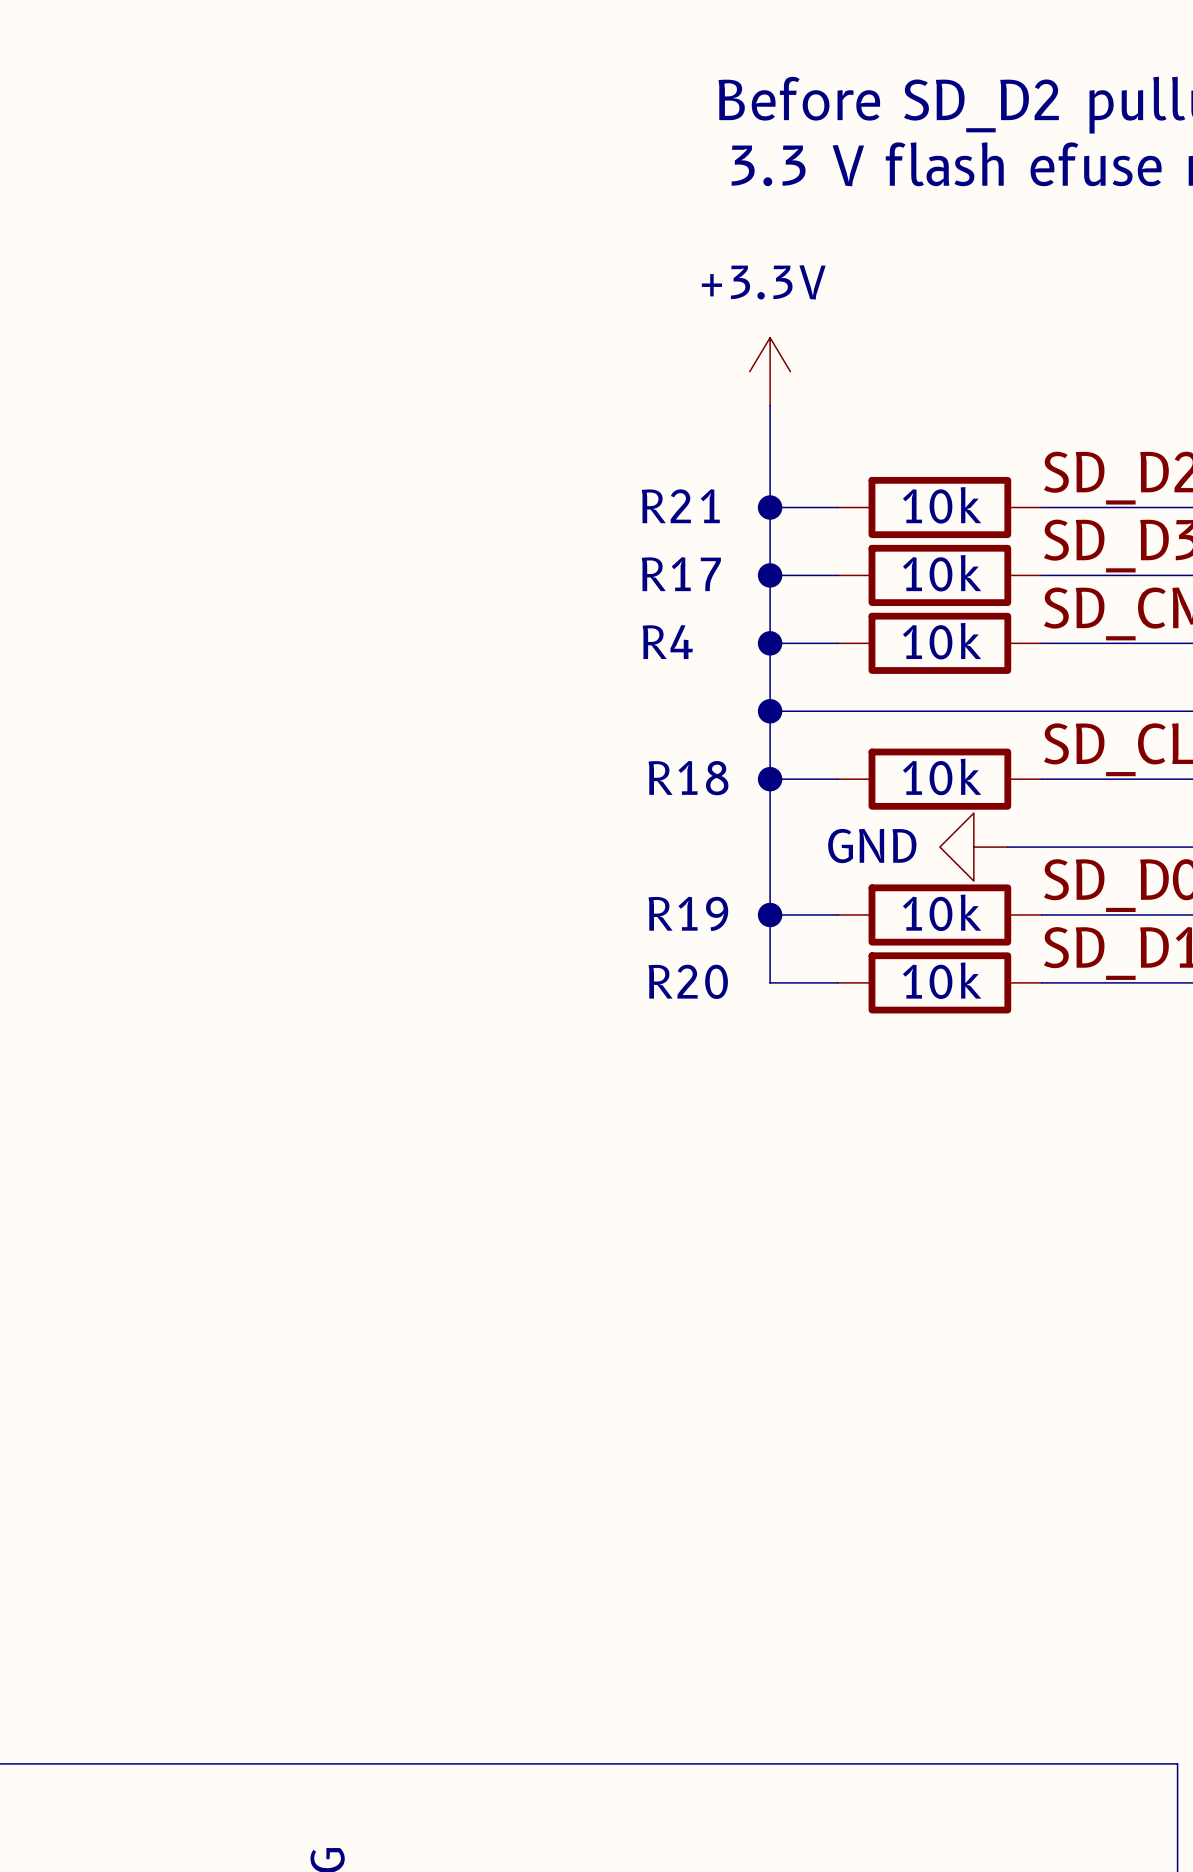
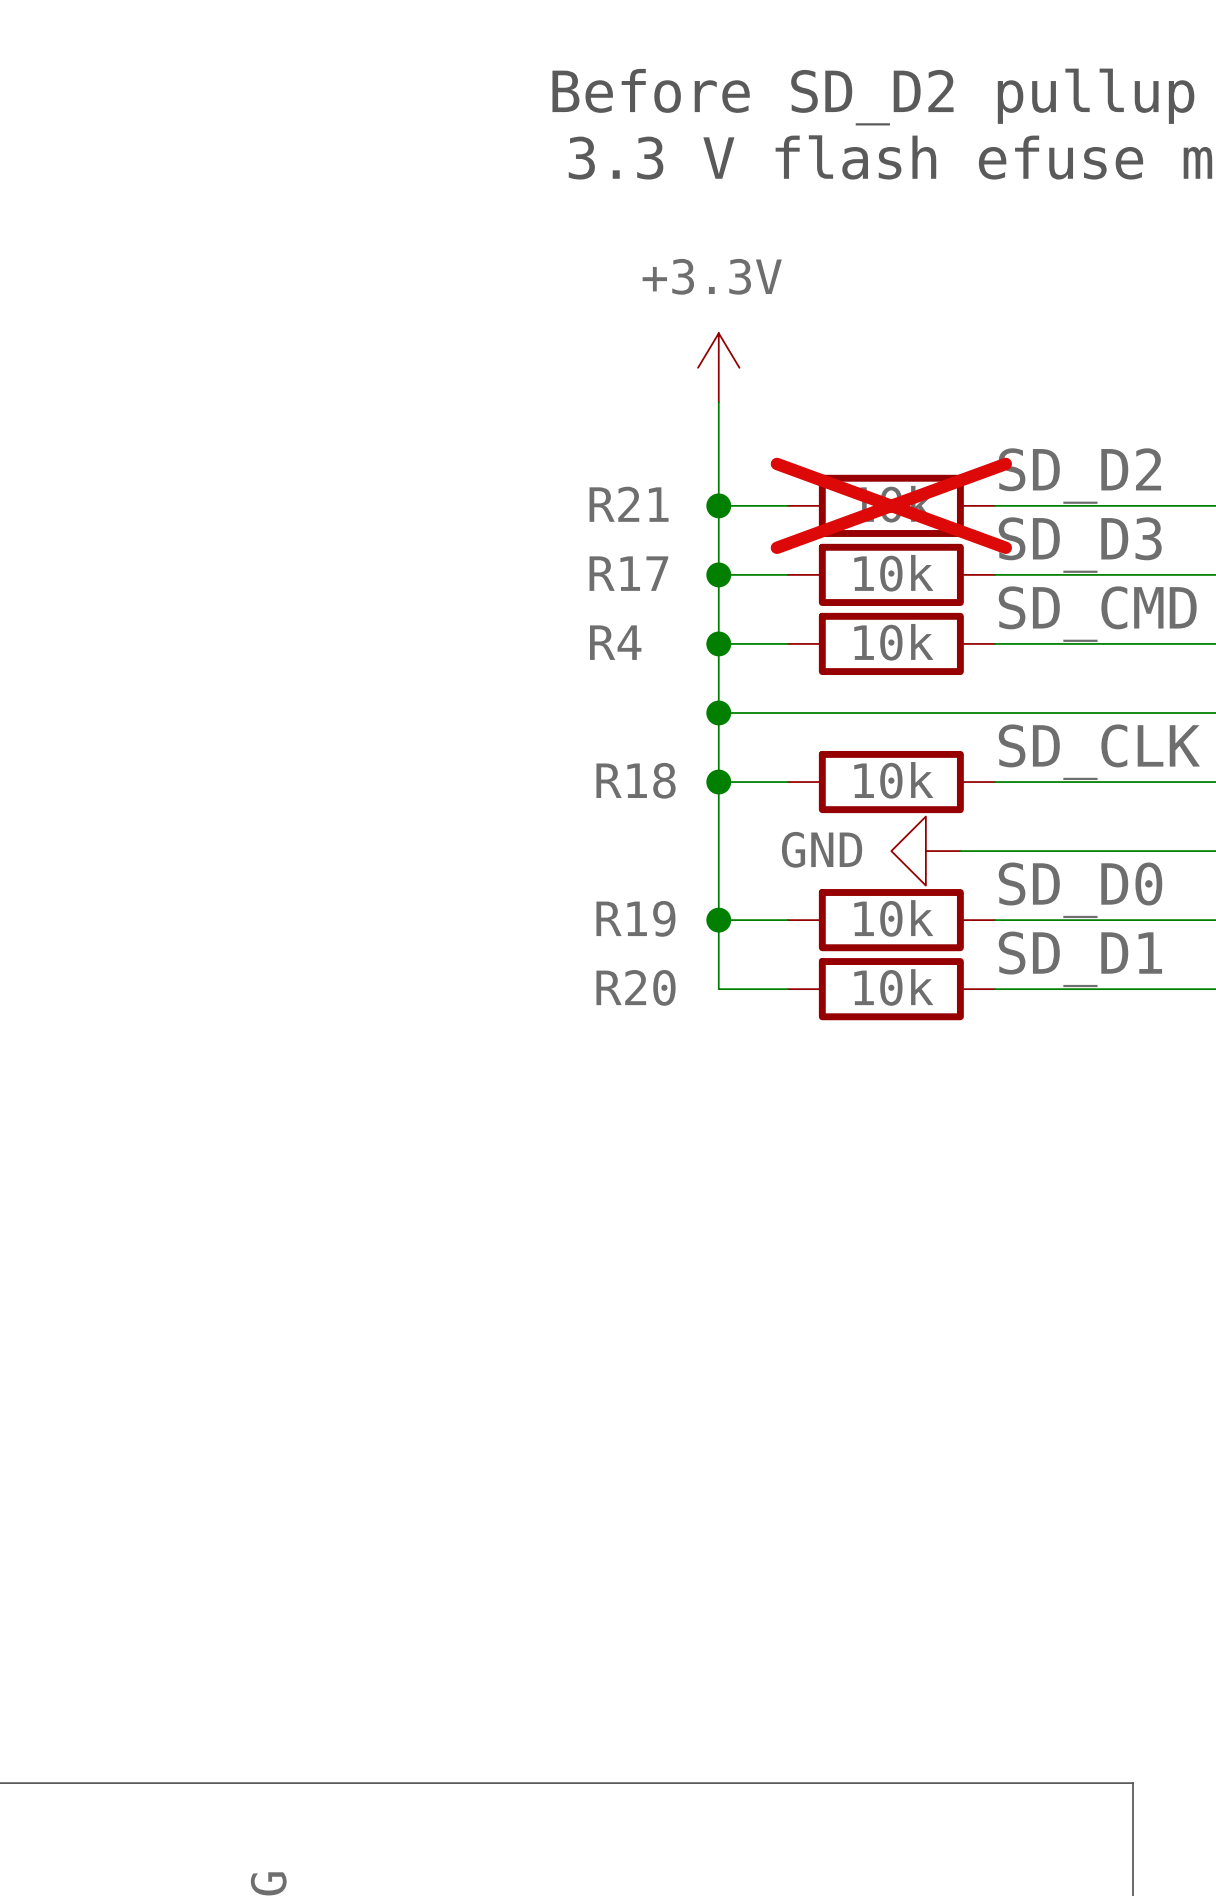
R21 do-not-place cross: none -> (891, 505)

